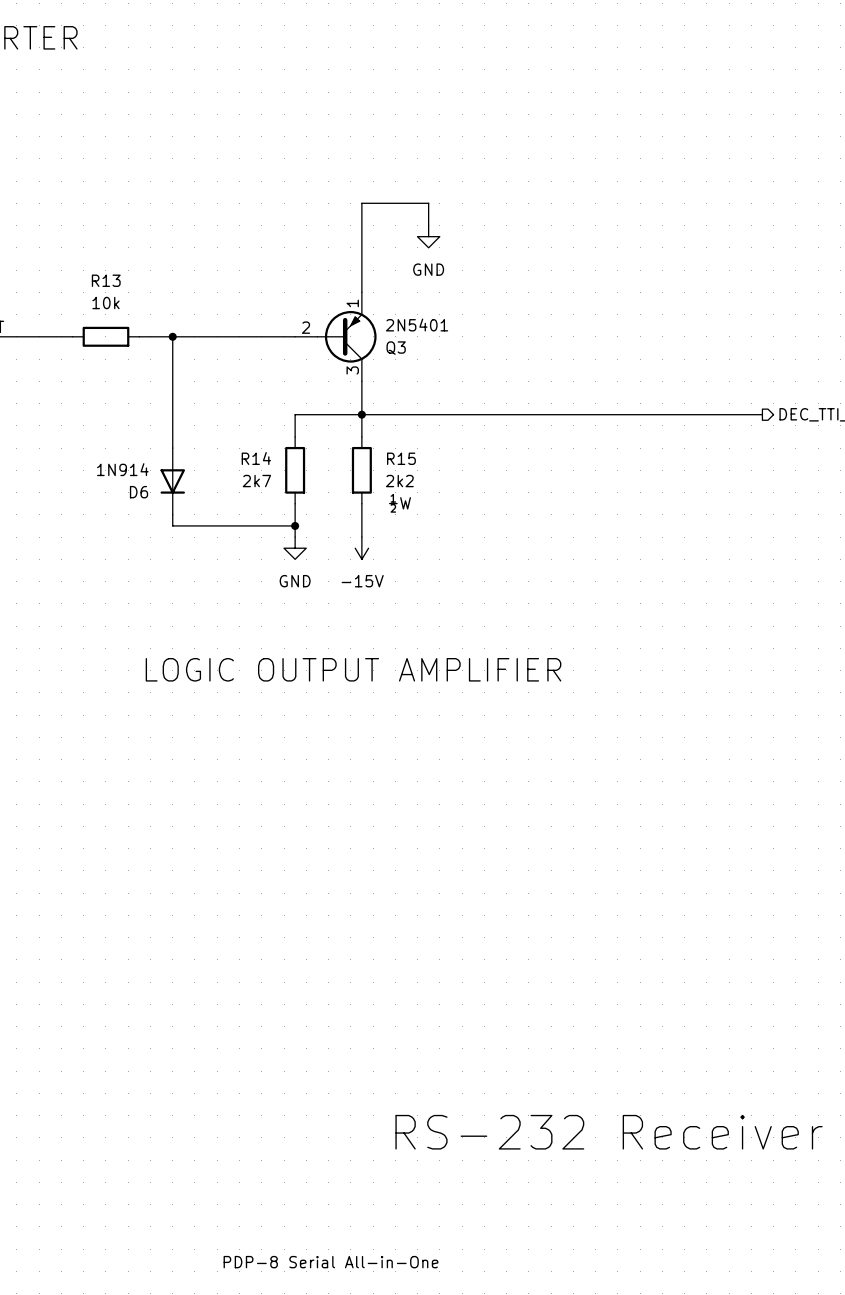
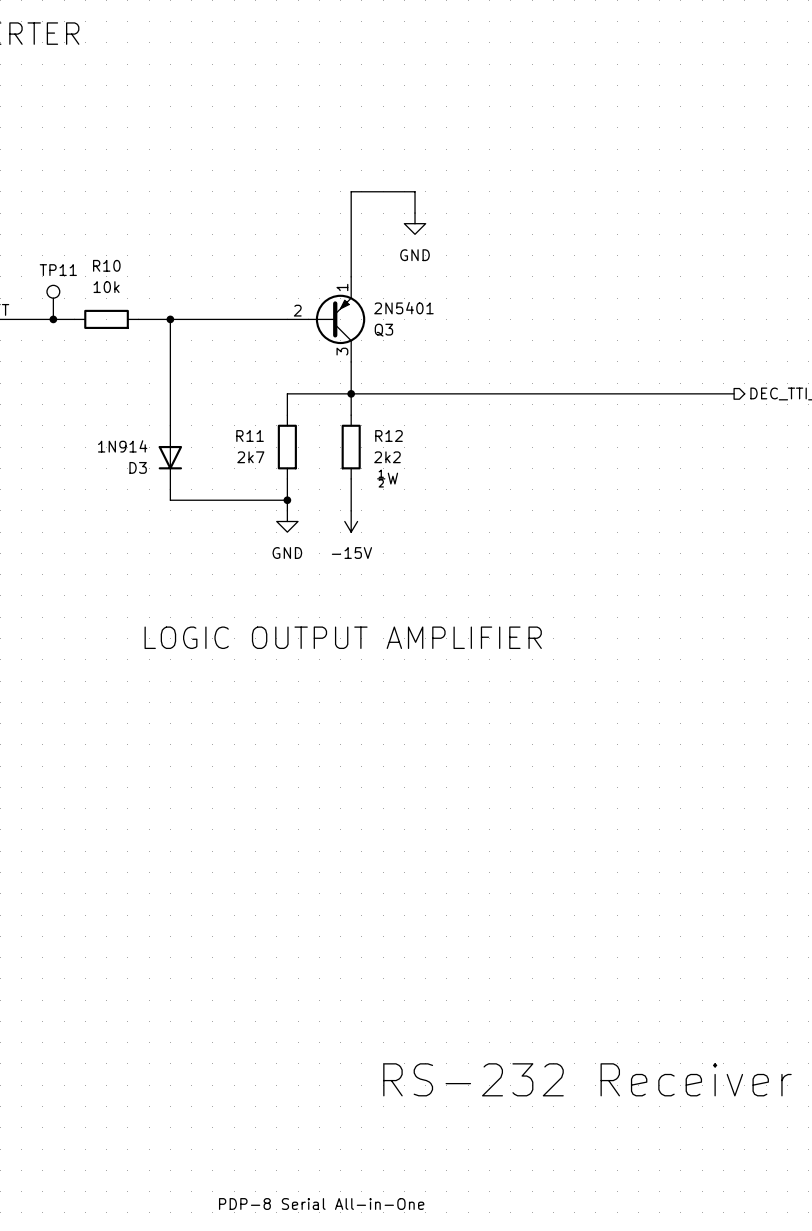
R13 name: R13 (106, 280) -> R10 (106, 265)
TP11: none -> (53, 302)
junction: none -> (53, 319)
R14 name: R14 (256, 458) -> R11 (250, 436)
R15 name: R15 (401, 458) -> R12 (389, 436)
D6 name: D6 (139, 492) -> D3 (138, 467)

